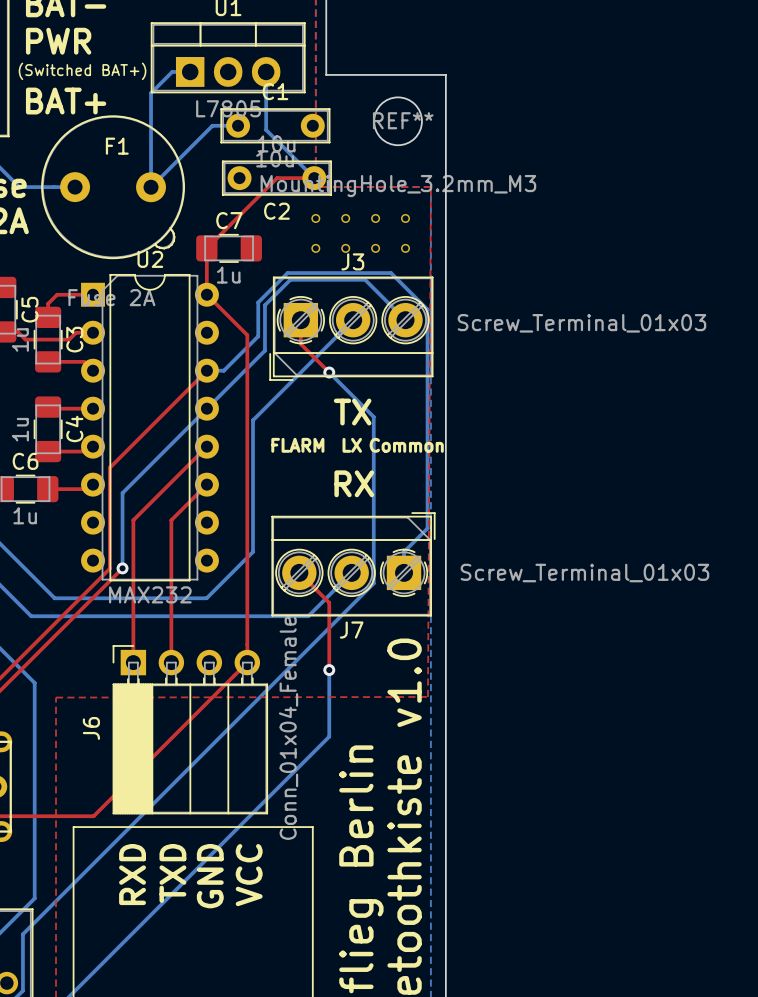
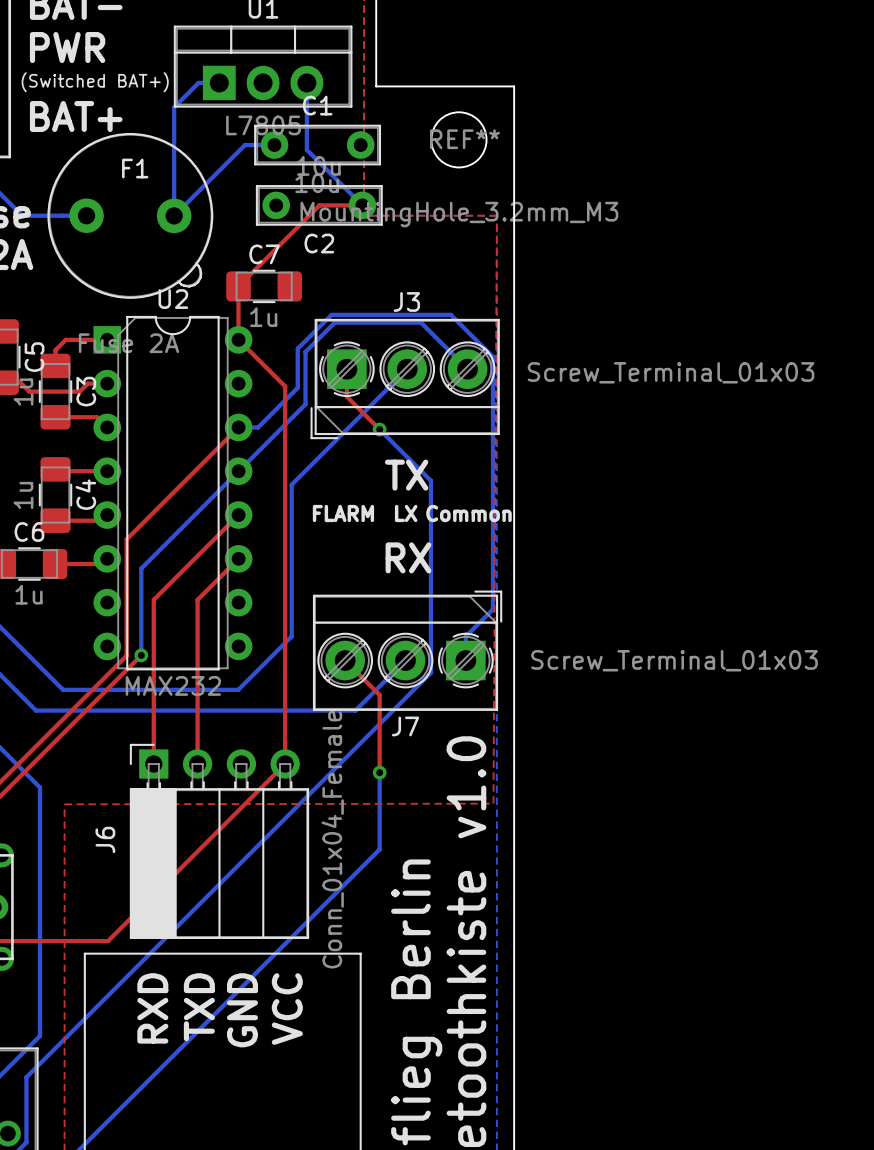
part: (315, 218) -> none
part: (345, 218) -> none
part: (375, 218) -> none
part: (405, 218) -> none
part: (315, 248) -> none
part: (345, 248) -> none
part: (375, 248) -> none
part: (405, 248) -> none

